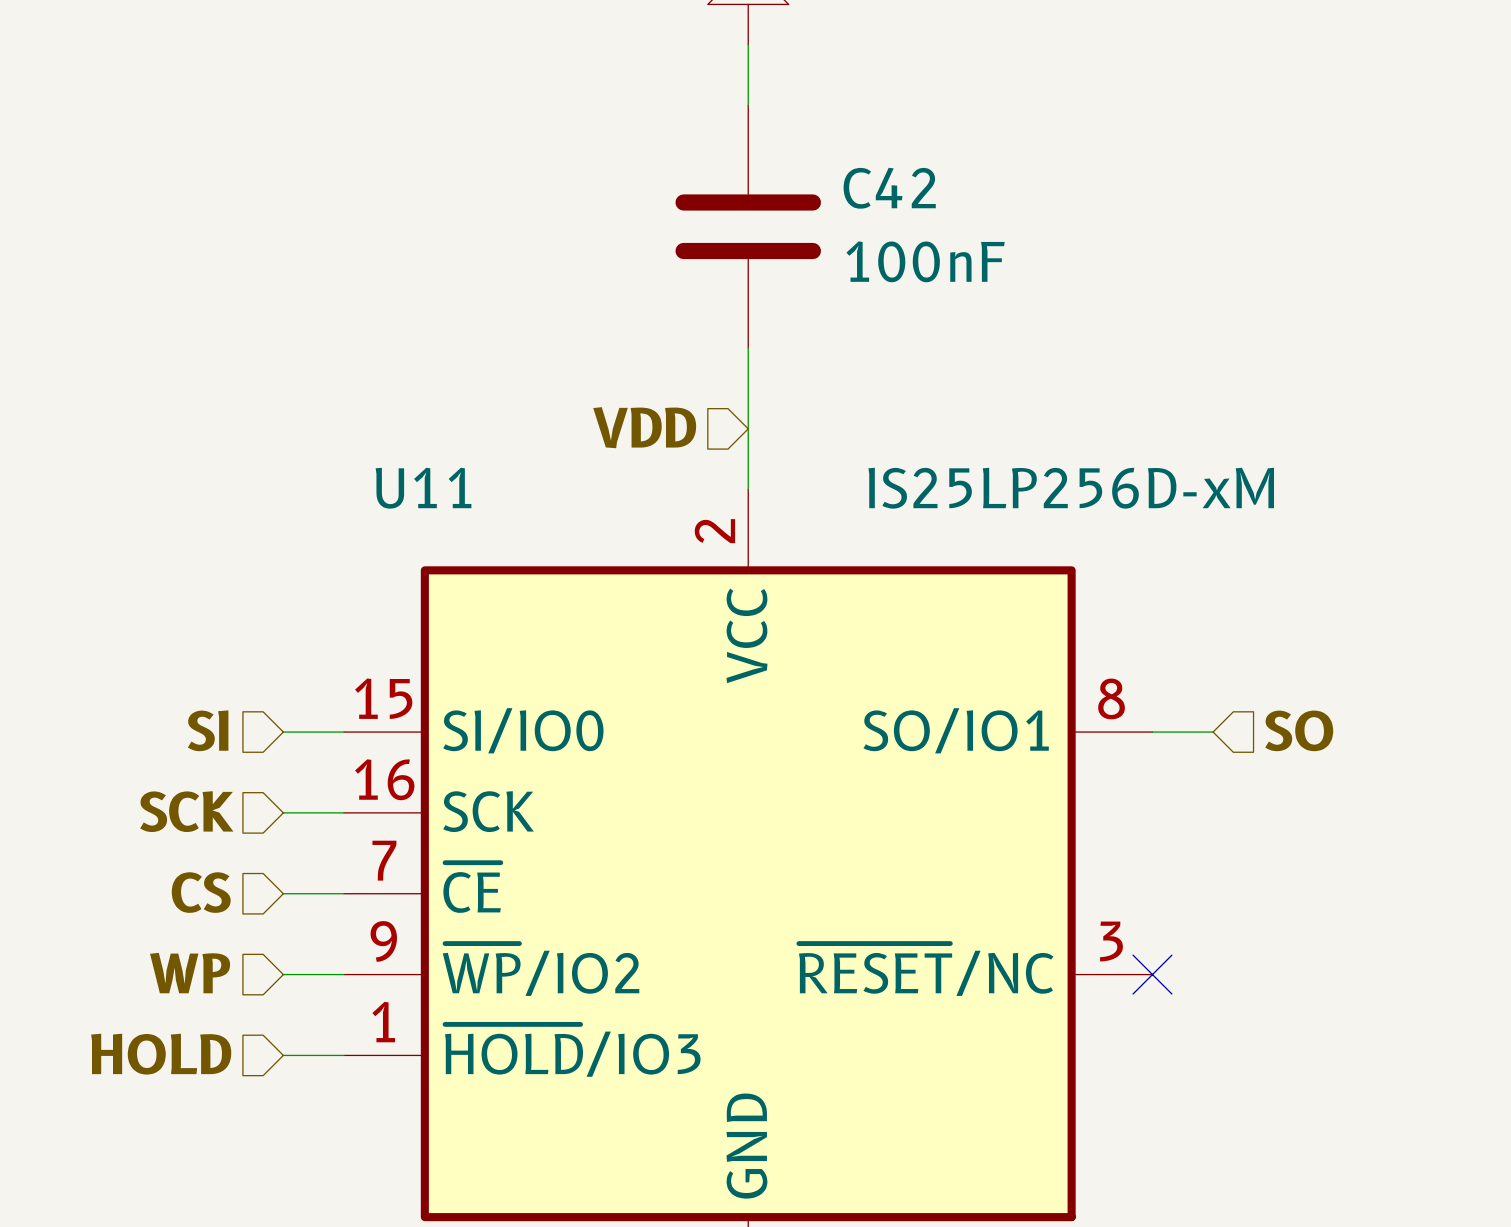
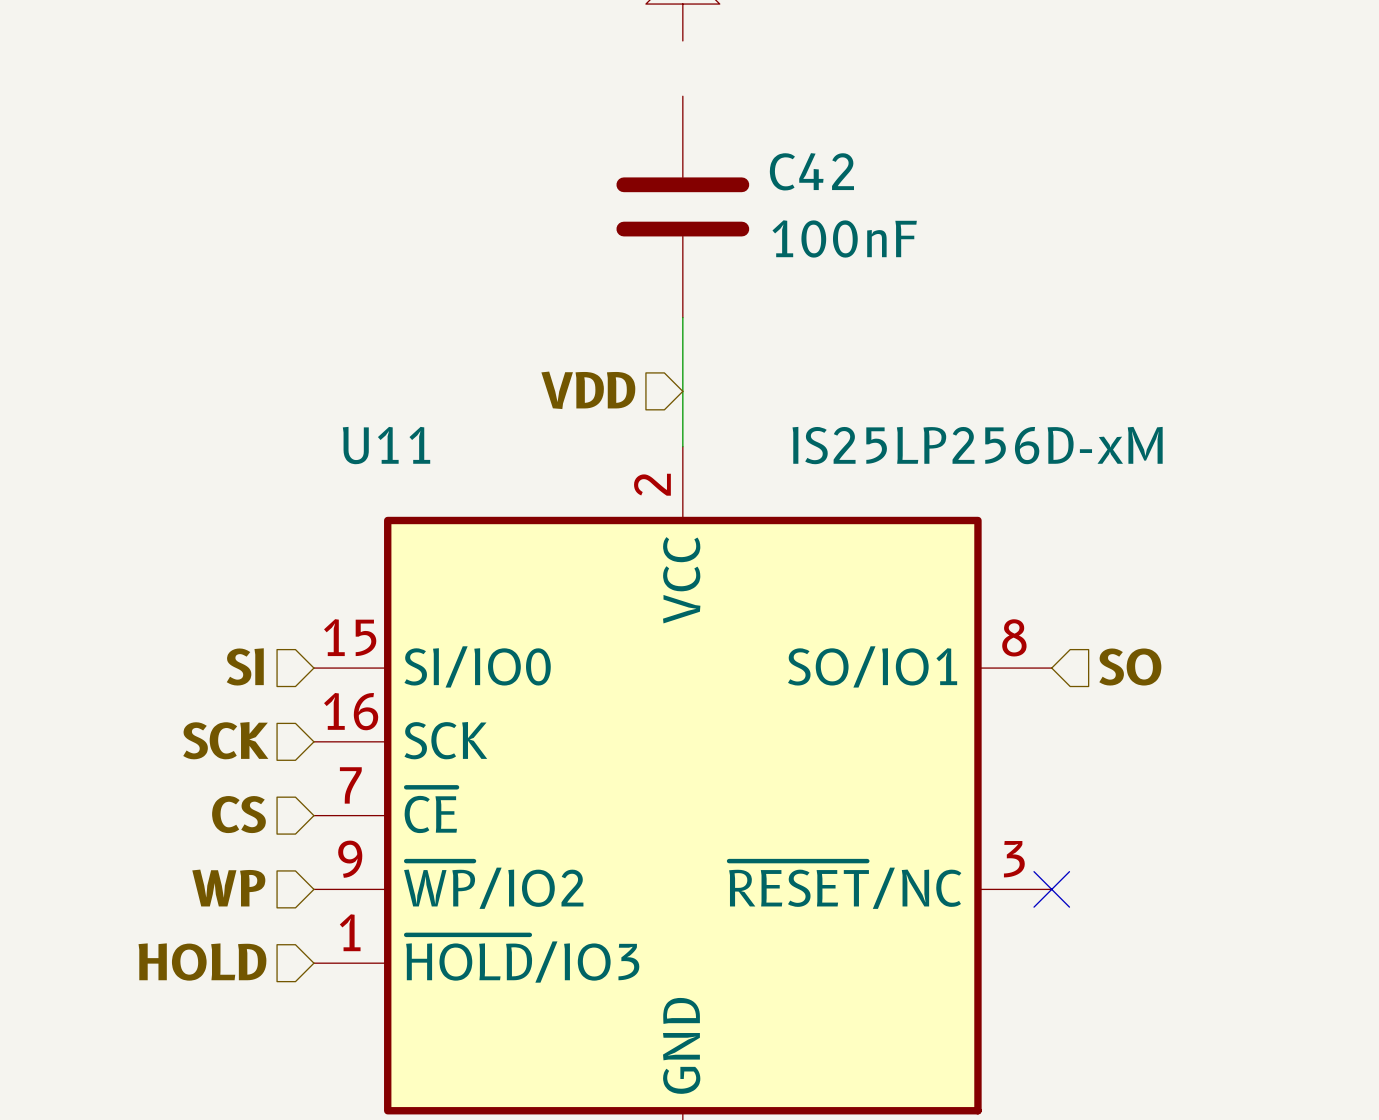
wire: (748, 44) (748, 105) -> none
hierarchical label position: SI (208, 730) -> SI (245, 666)
hierarchical label position: SO (1299, 730) -> SO (1130, 667)
wire: (283, 732) (344, 732) -> none
wire: (1152, 732) (1213, 732) -> none
hierarchical label position: SCK (186, 811) -> SCK (225, 740)
wire: (283, 812) (344, 812) -> none
hierarchical label position: CS (201, 892) -> CS (238, 814)
wire: (283, 893) (344, 893) -> none
hierarchical label position: WP (190, 973) -> WP (228, 888)
wire: (283, 974) (344, 974) -> none
hierarchical label position: HOLD (161, 1054) -> HOLD (202, 962)
wire: (283, 1055) (344, 1055) -> none

